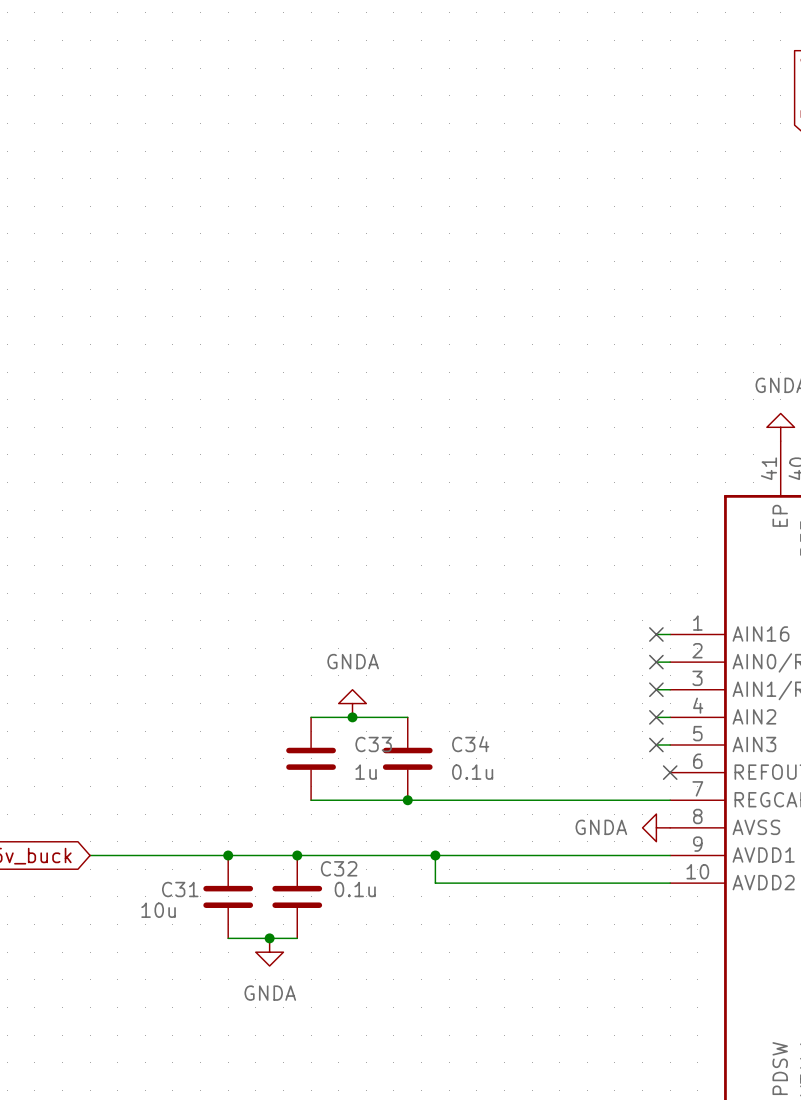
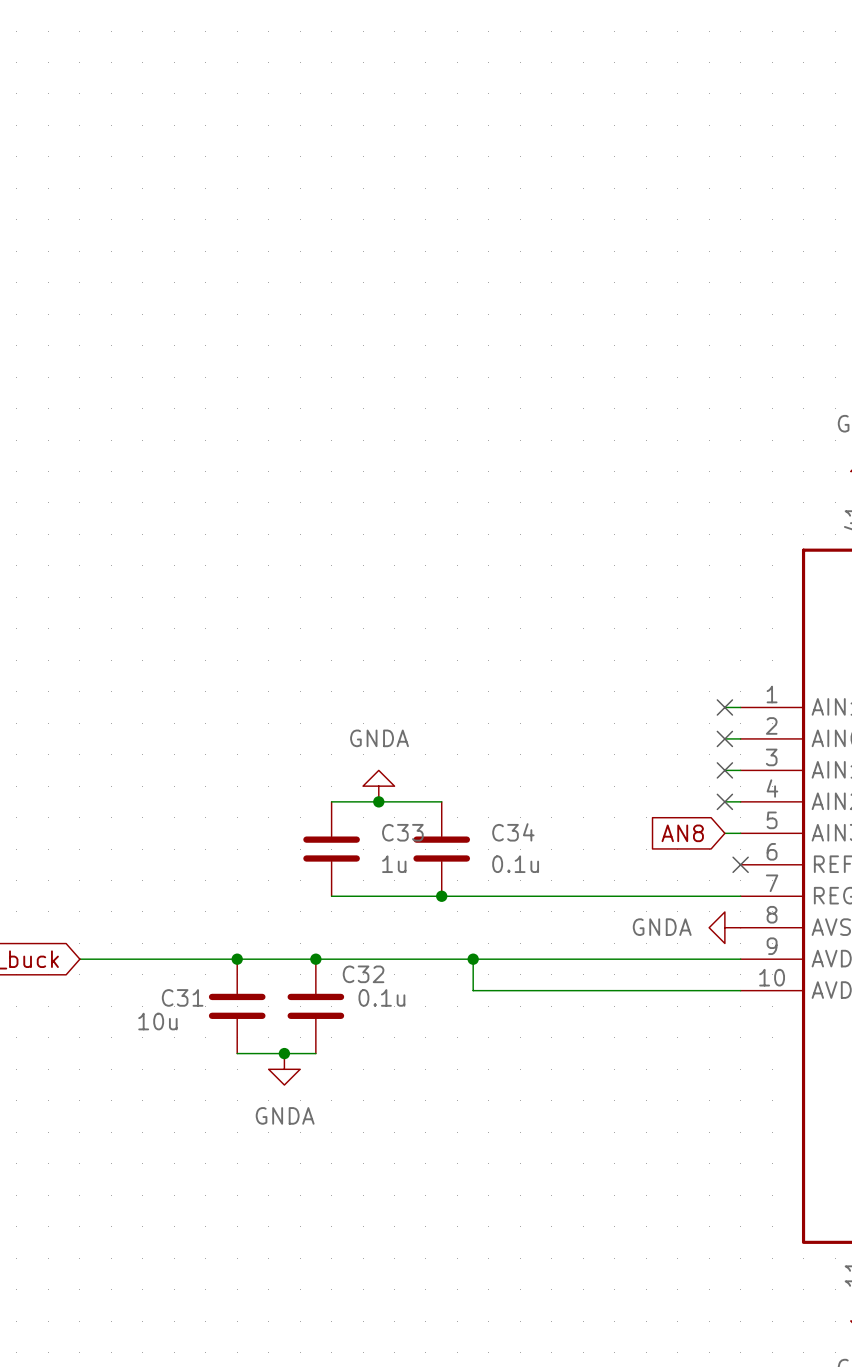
global label: none -> AN8 (682, 833)
no-connect mark: (656, 744) -> none

